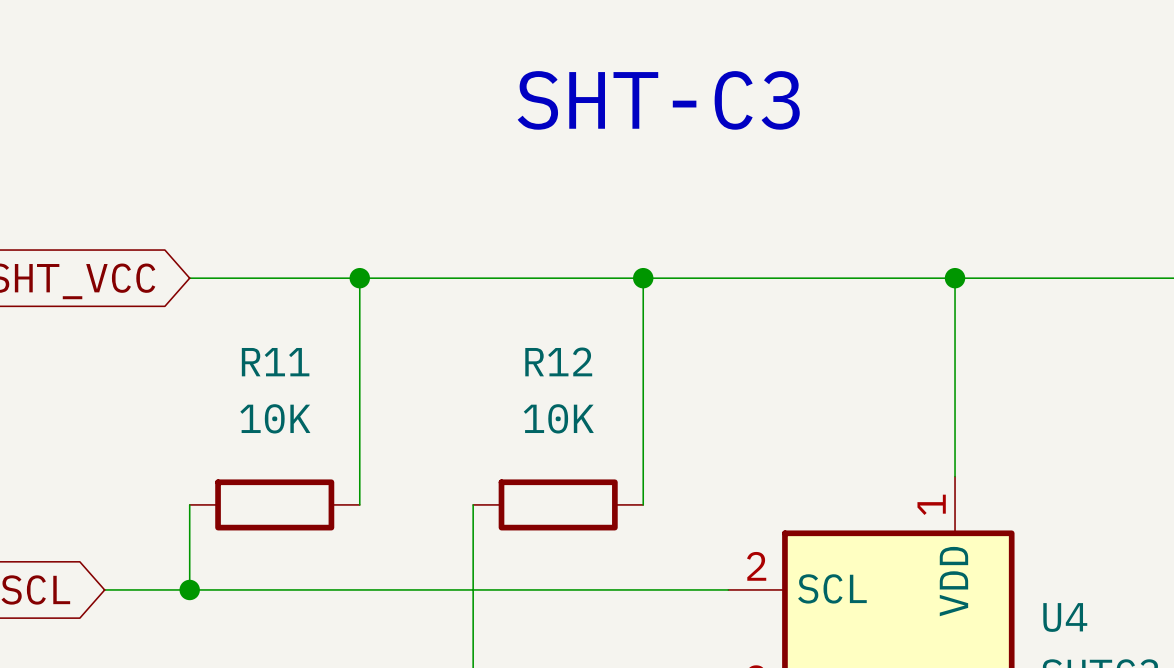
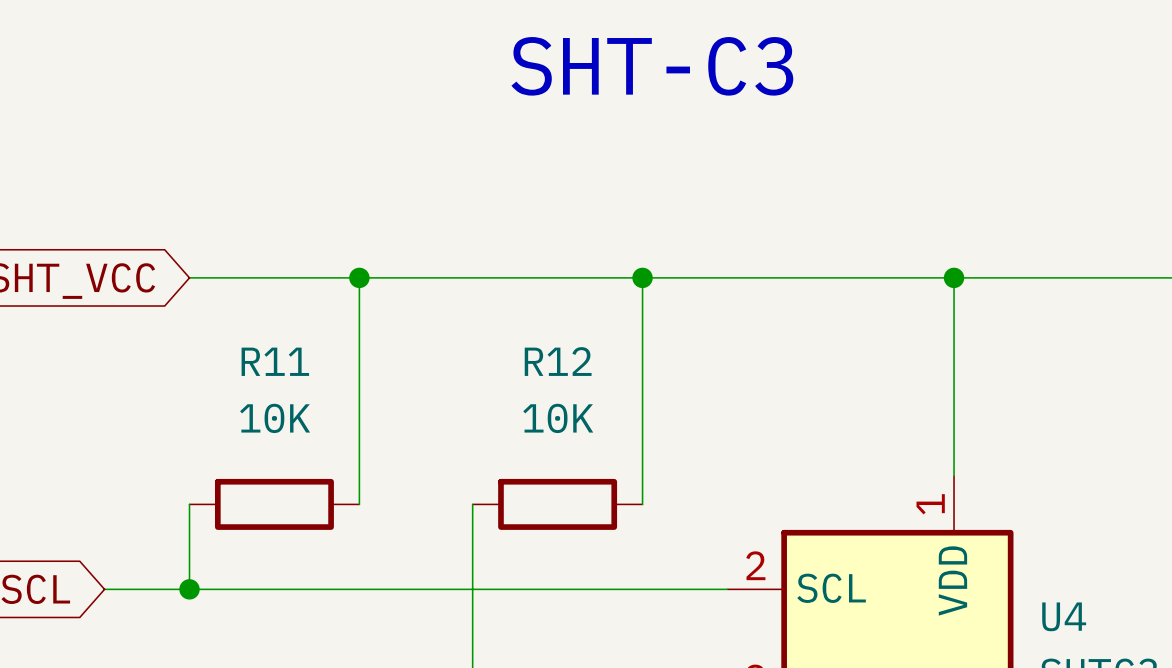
text position: SHT-C3 (658, 100) -> SHT-C3 (652, 66)

